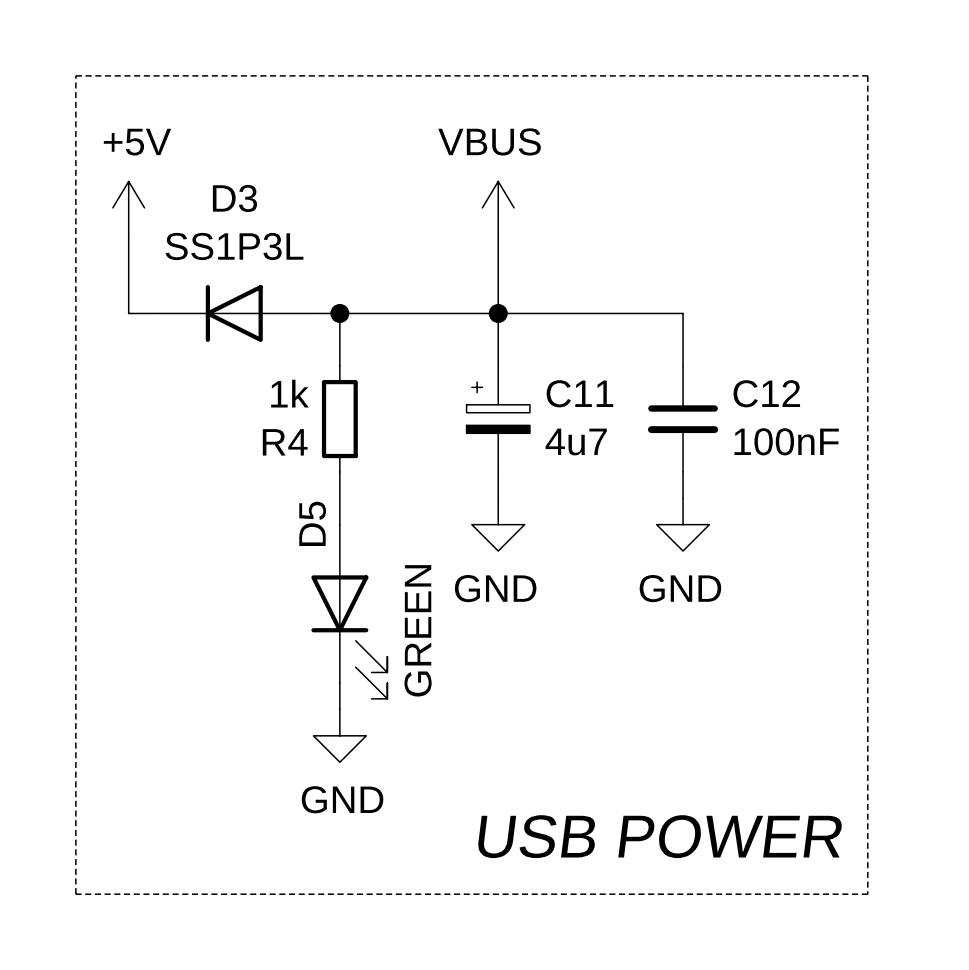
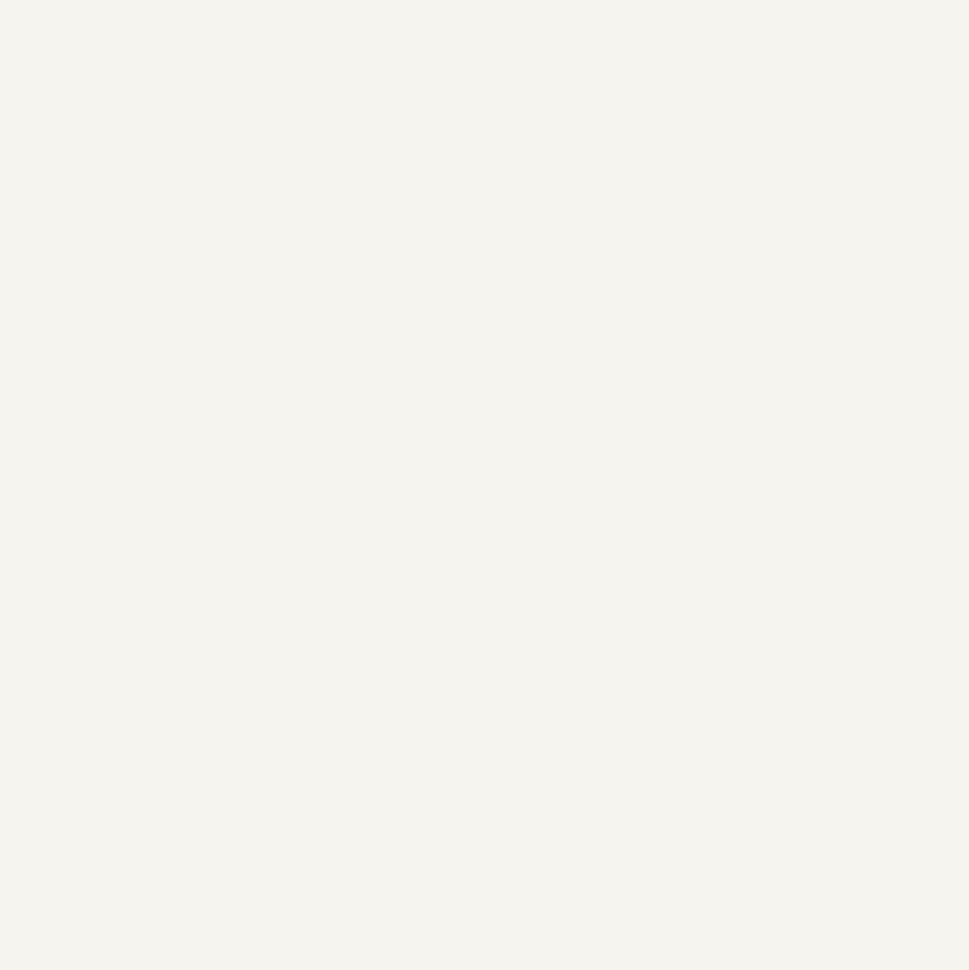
line: (75, 75) (867, 75) (867, 894) (75, 894) (75, 75) -> none
power symbol: +5V (128, 207) -> none
power symbol: VBUS (498, 207) -> none
wire: (128, 234) (128, 313) (155, 313) -> none
wire: (498, 234) (498, 366) -> none
D3: SS1P3L (234, 313) -> none
wire: (313, 313) (683, 313) (683, 366) -> none
wire: (339, 313) (339, 366) -> none
junction: (339, 313) -> none
junction: (498, 313) -> none
R4: 1k (339, 419) -> none
C11: 4u7 (498, 419) -> none
C12: 100nF (683, 419) -> none
wire: (339, 471) (339, 524) -> none
wire: (498, 471) (498, 498) -> none
wire: (683, 471) (683, 498) -> none
power symbol: GND (498, 524) -> none
power symbol: GND (683, 524) -> none
D5: GREEN (349, 611) -> none
wire: (339, 683) (339, 709) -> none
power symbol: GND (339, 735) -> none
text: USB POWER (660, 836) -> none

